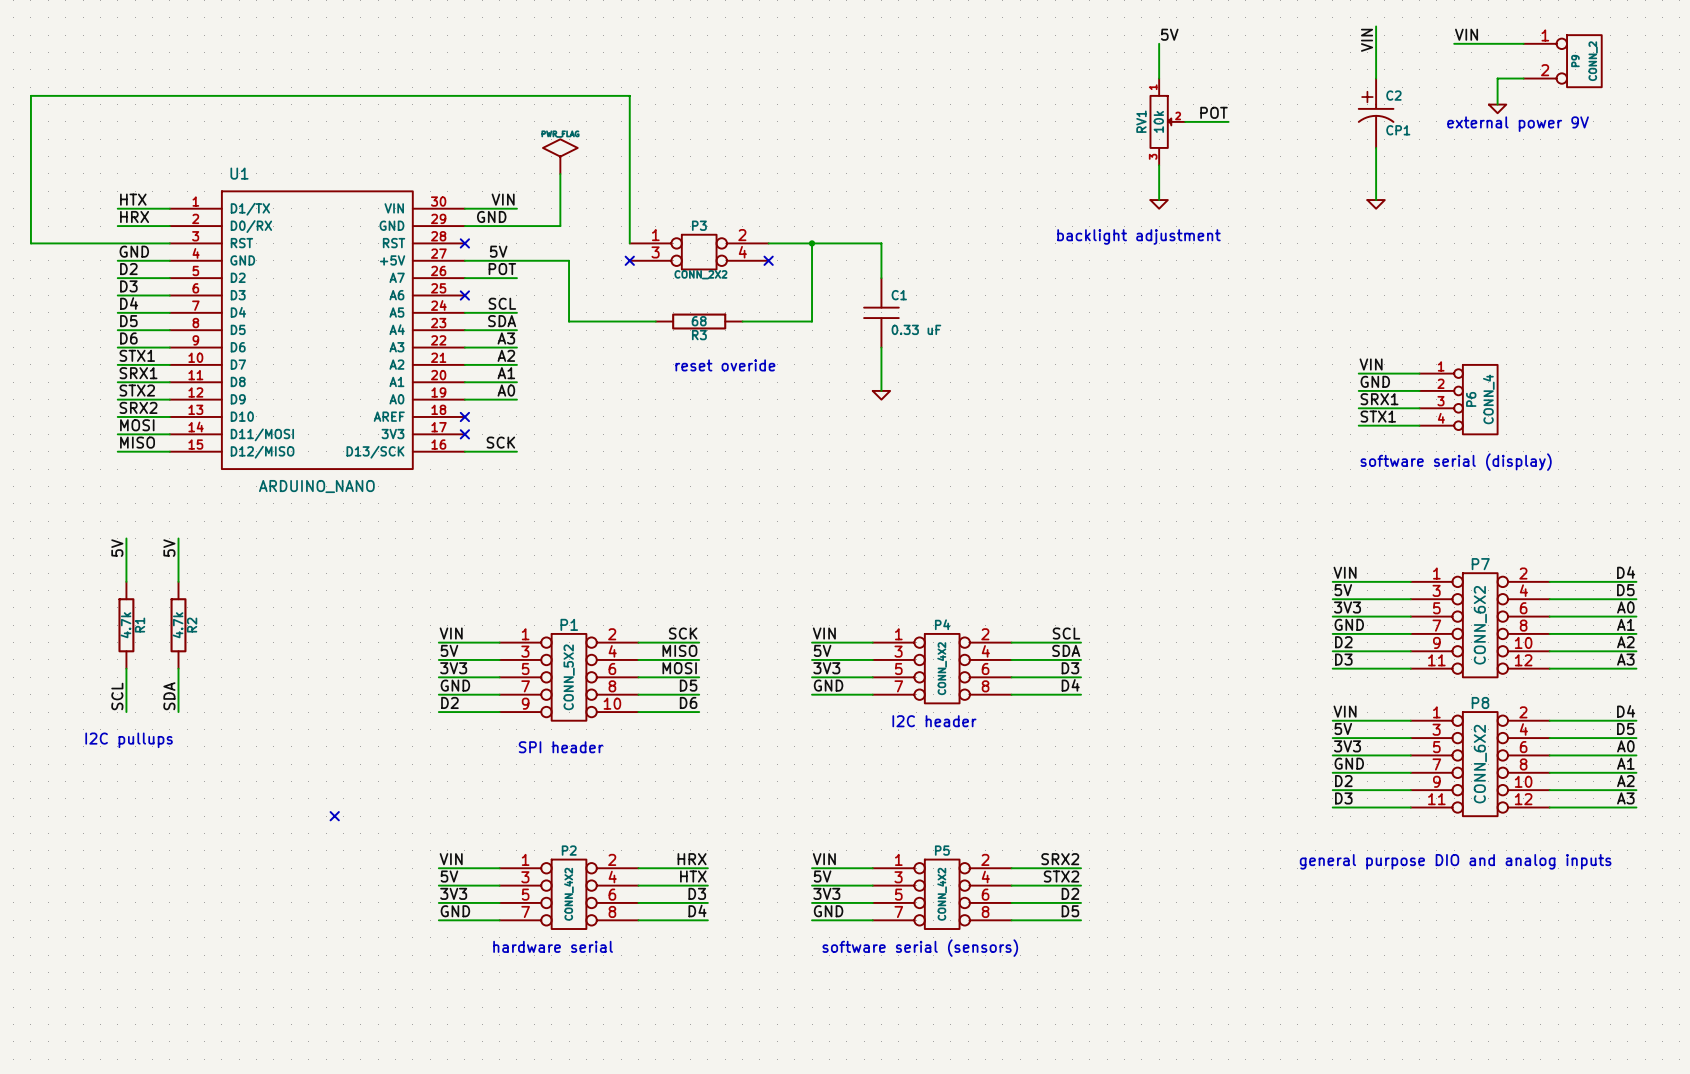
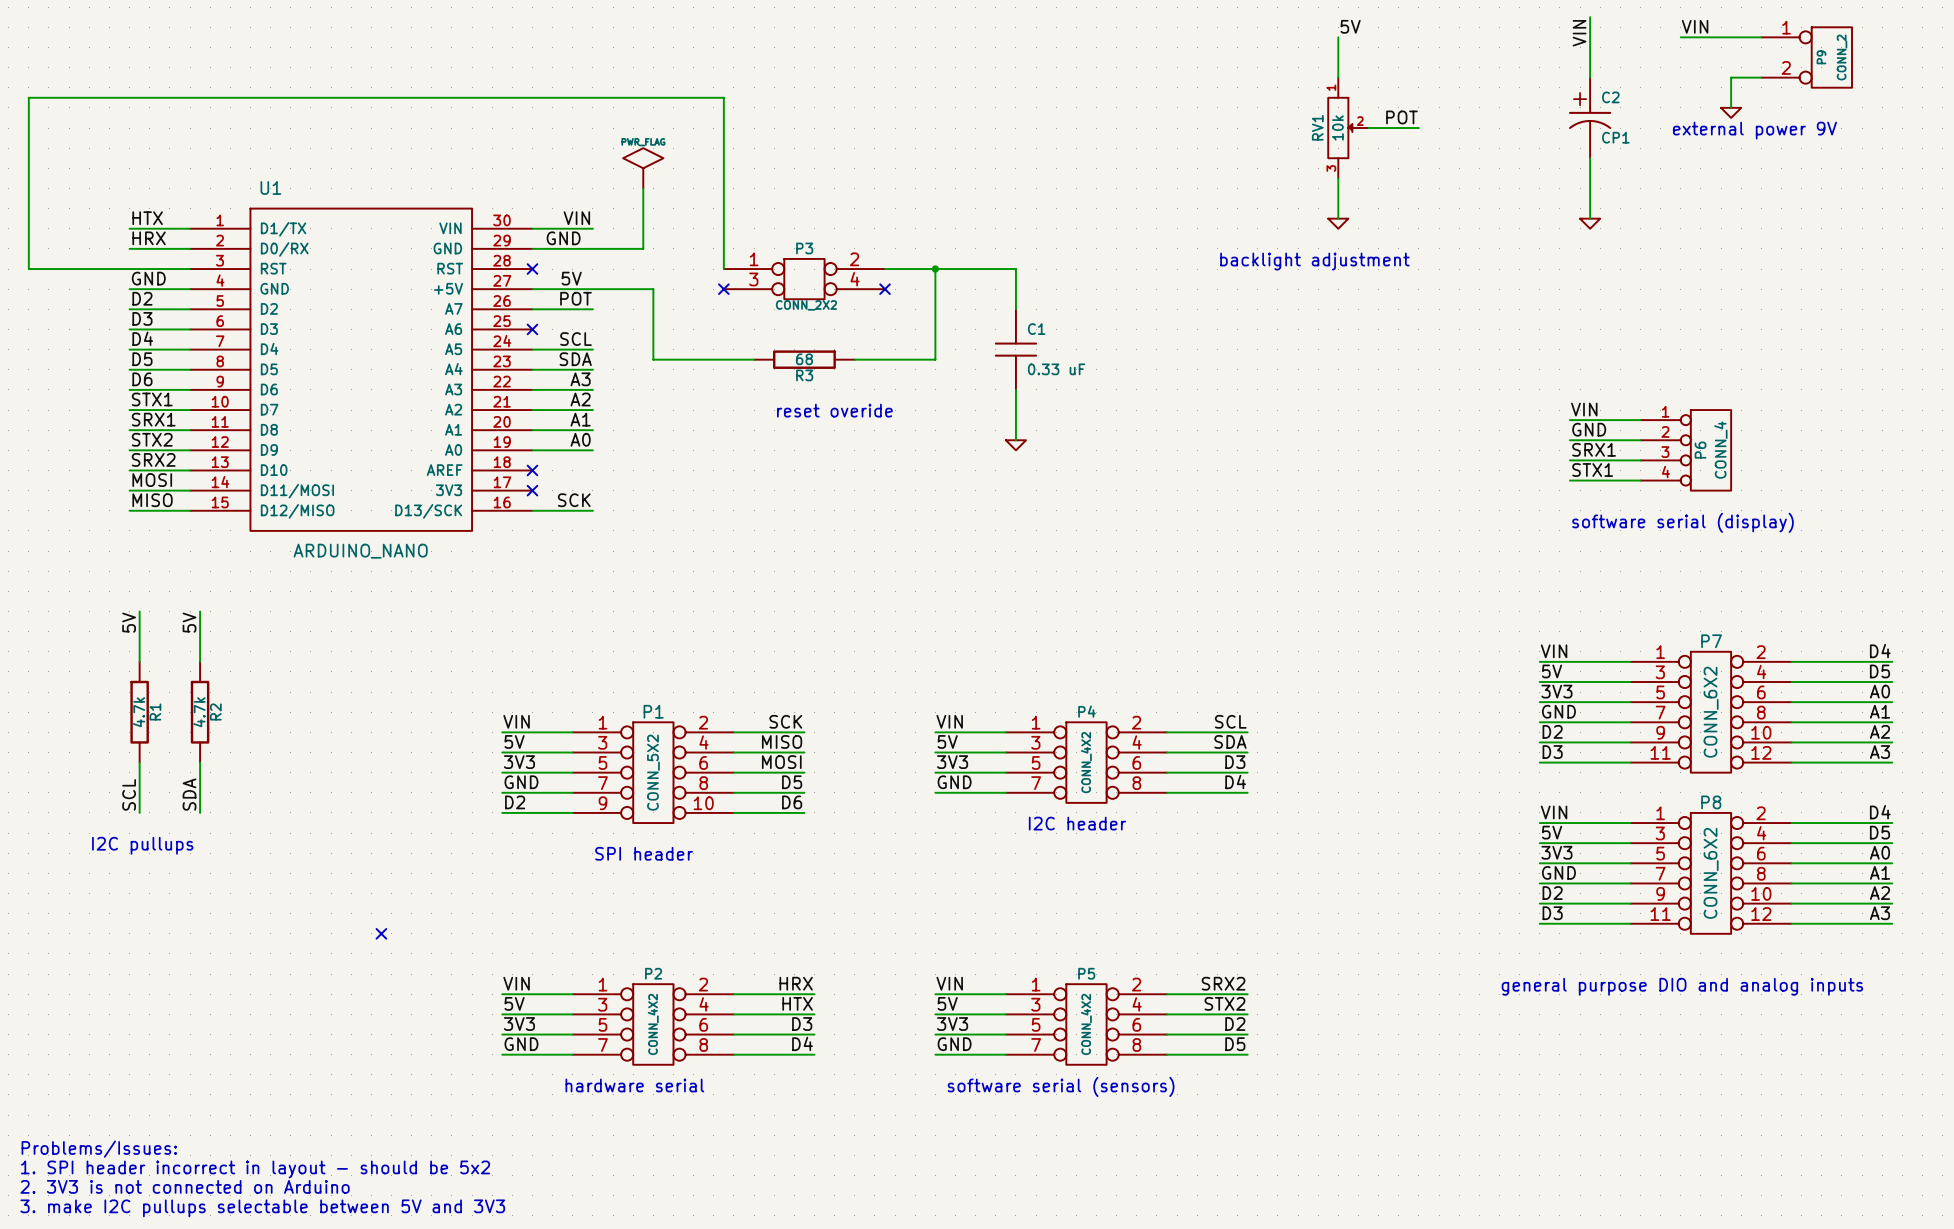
text: none -> Problems/Issues: (99, 1149)
text: none -> 1. SPI header incorrect in layout - should be 5x2 (255, 1169)
text: none -> 2. 3V3 is not connected on Arduino (185, 1186)
text: none -> 3. make I2C pullups selectable between 5V and 3V3 (262, 1208)

